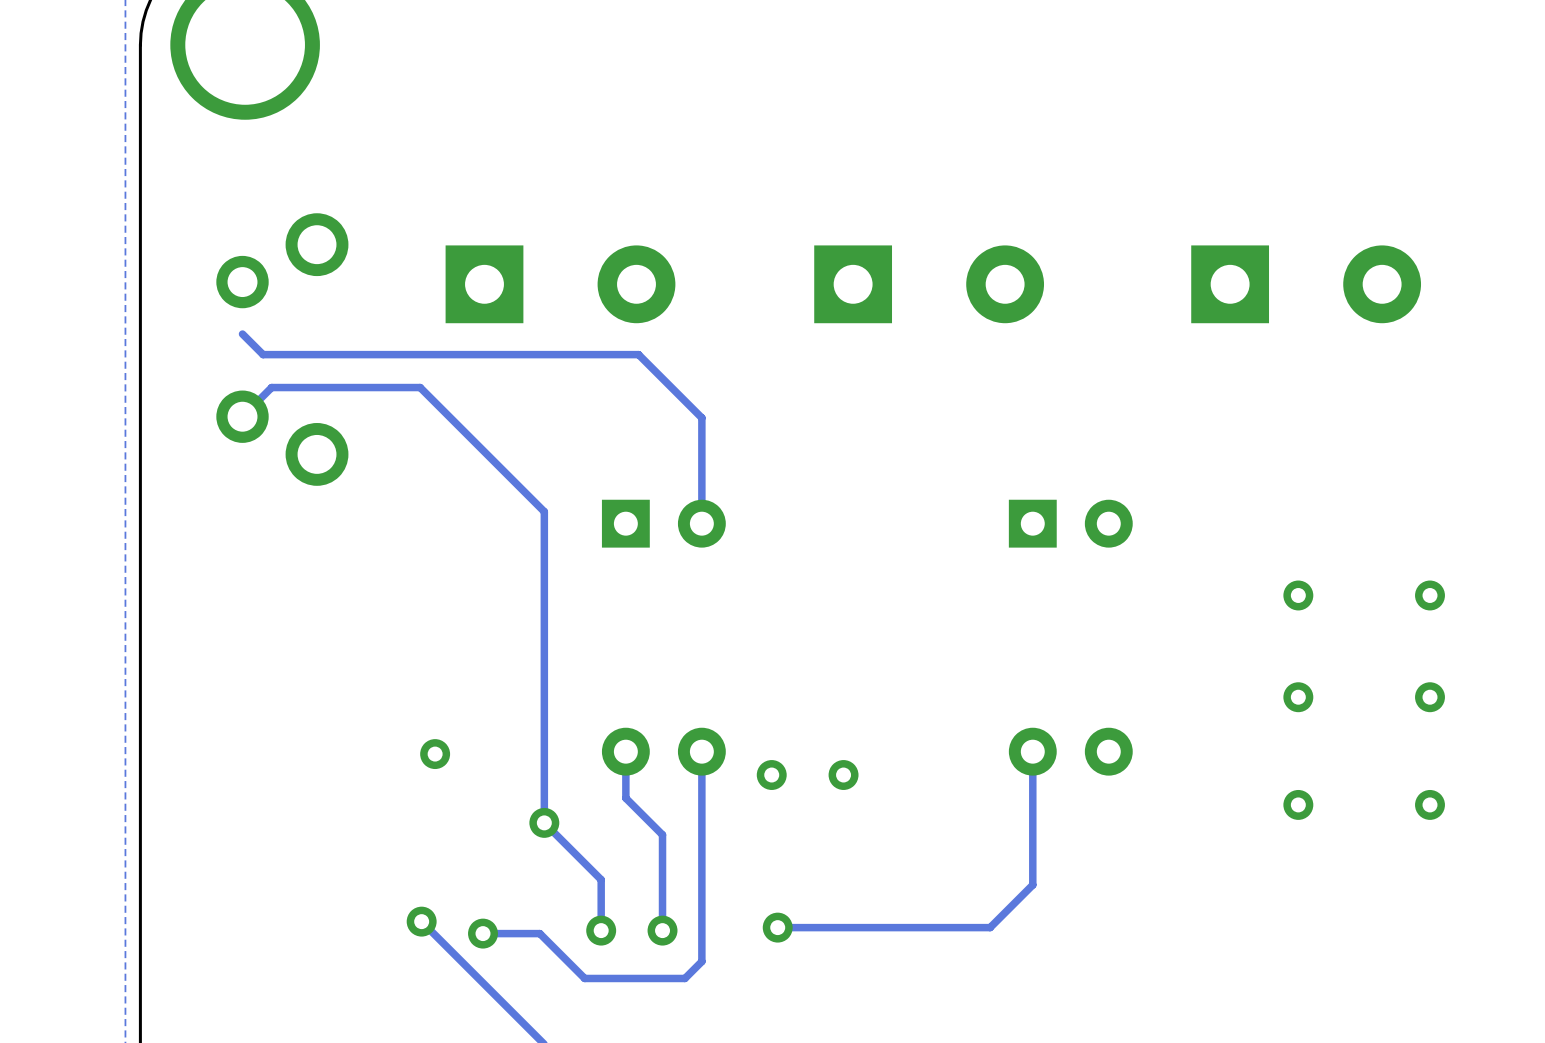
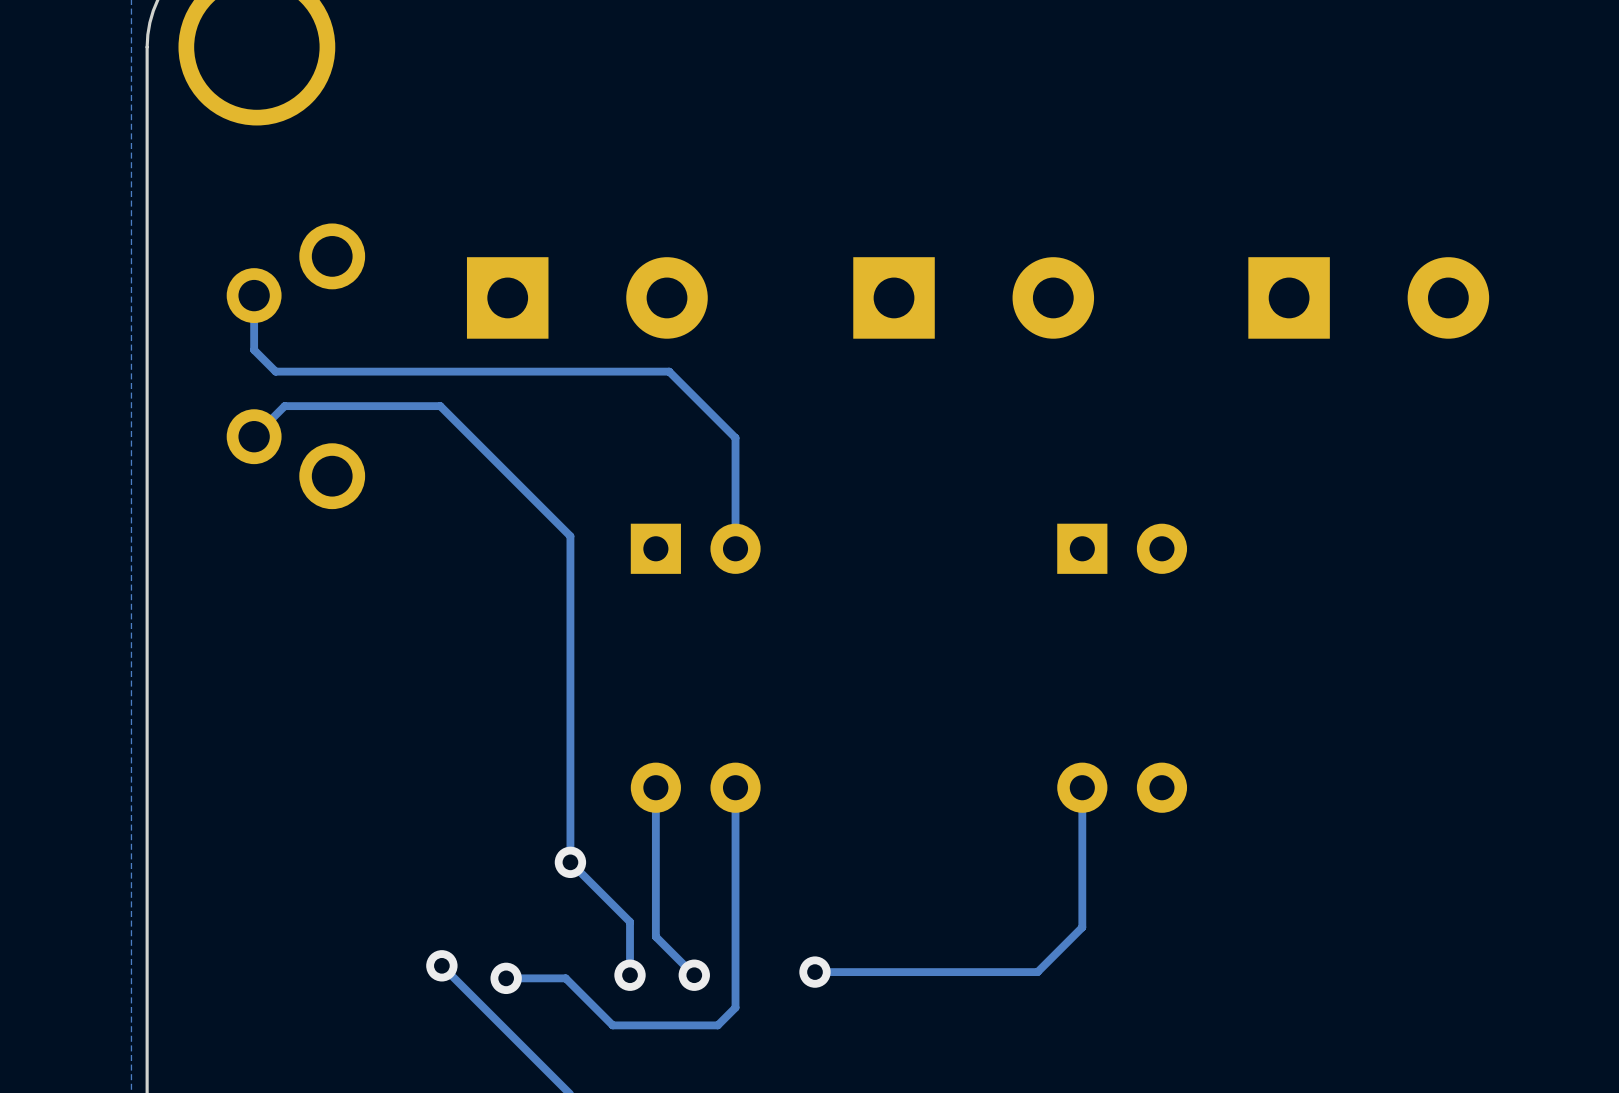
track: none -> (254, 295) (254, 350)
via: (1298, 595) -> none
via: (1429, 595) -> none
via: (1298, 697) -> none
via: (1429, 697) -> none
via: (435, 754) -> none
via: (771, 775) -> none
via: (843, 775) -> none
track: (625, 798) (662, 834) (662, 930) -> (655, 836) (655, 936) (694, 975)
via: (1298, 804) -> none
via: (1429, 804) -> none

